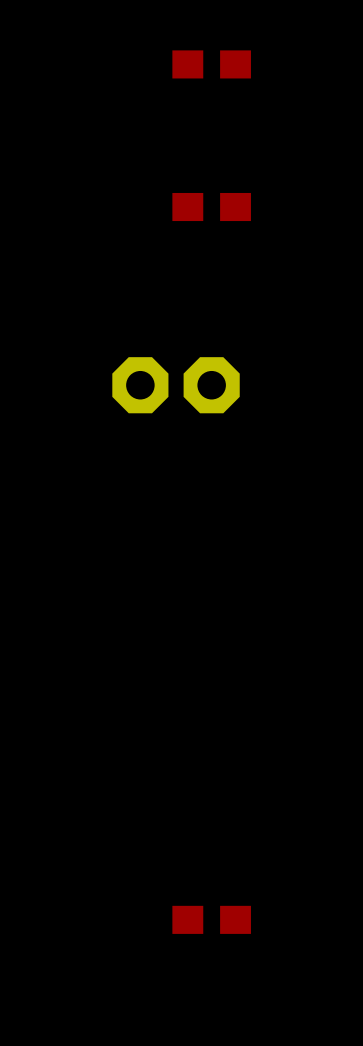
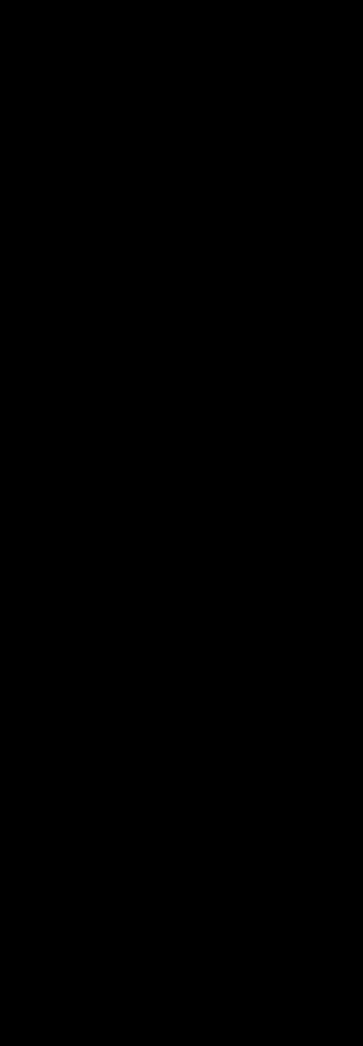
part: (211, 64) -> none
part: (211, 207) -> none
part: (176, 385) -> none
part: (211, 919) -> none

